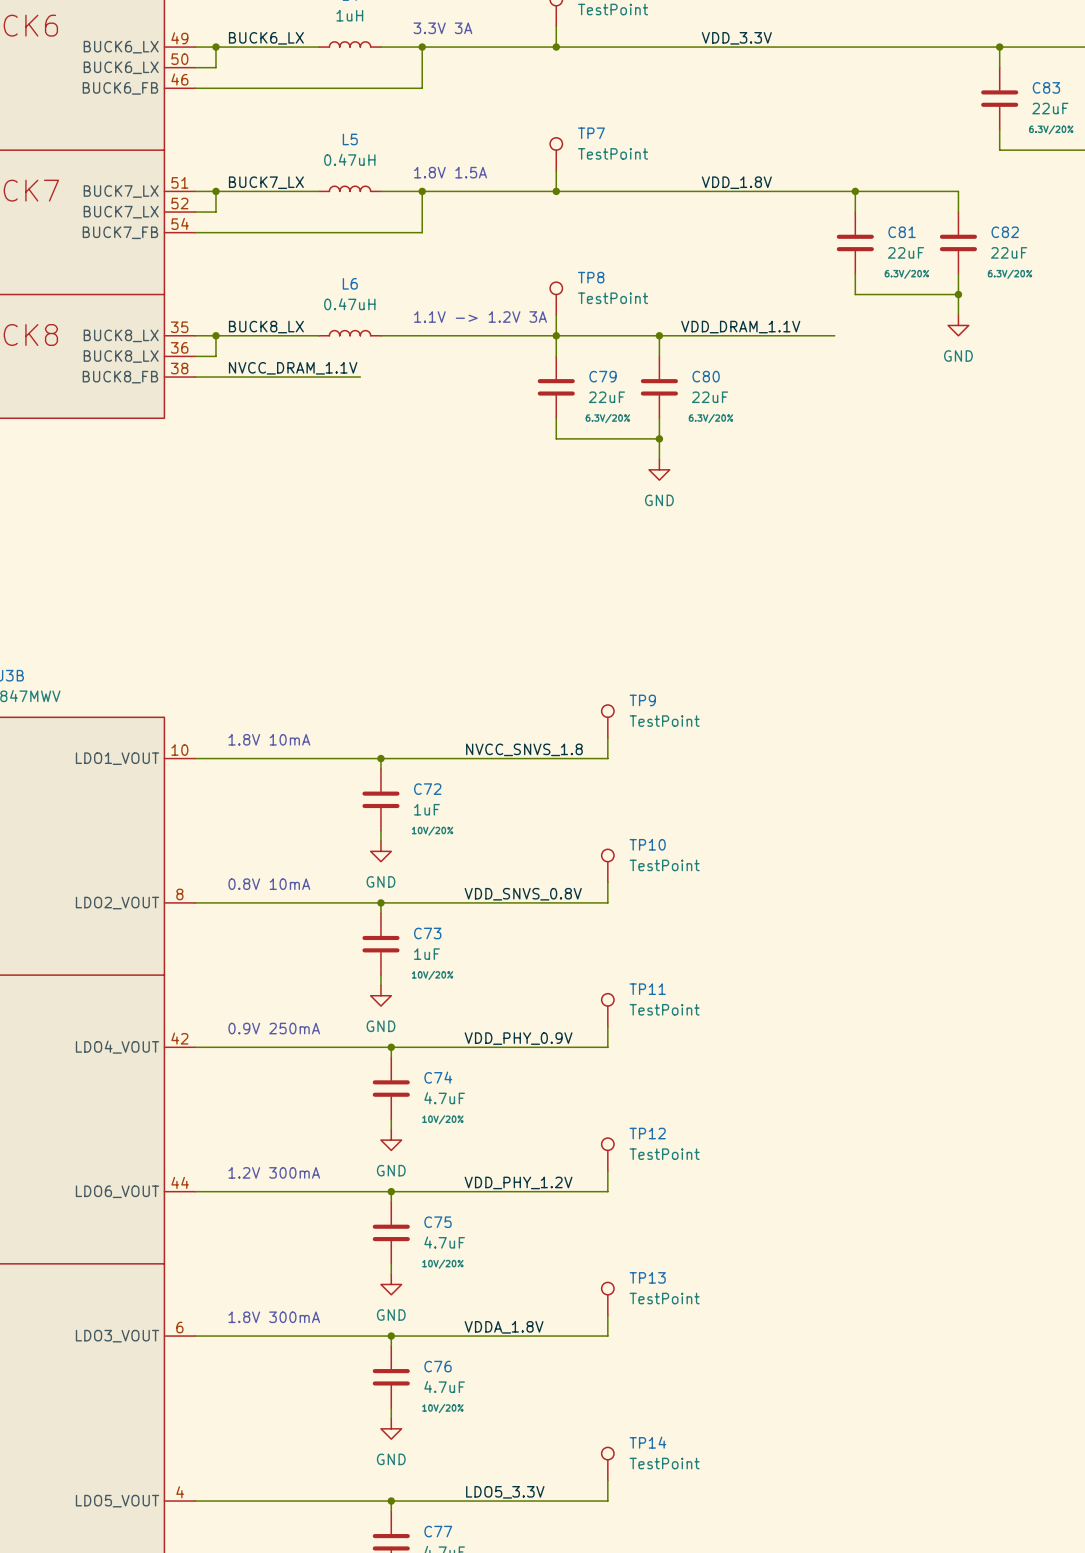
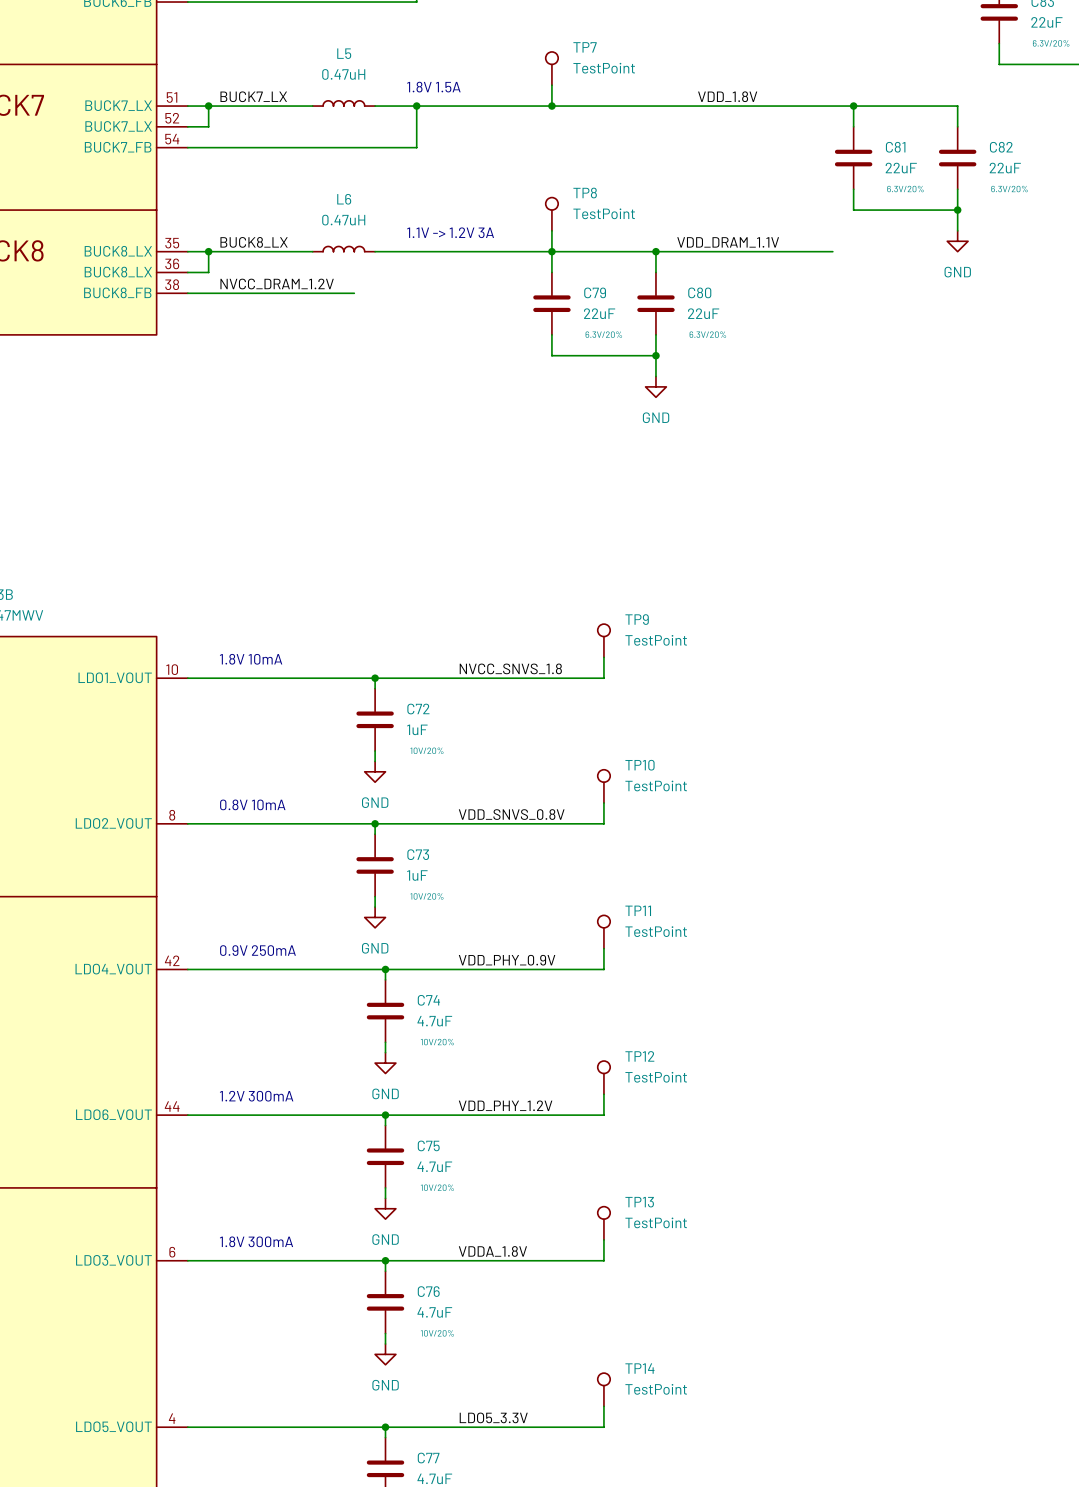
label: NVCC_DRAM_1.1V (293, 368) -> NVCC_DRAM_1.2V (277, 284)

